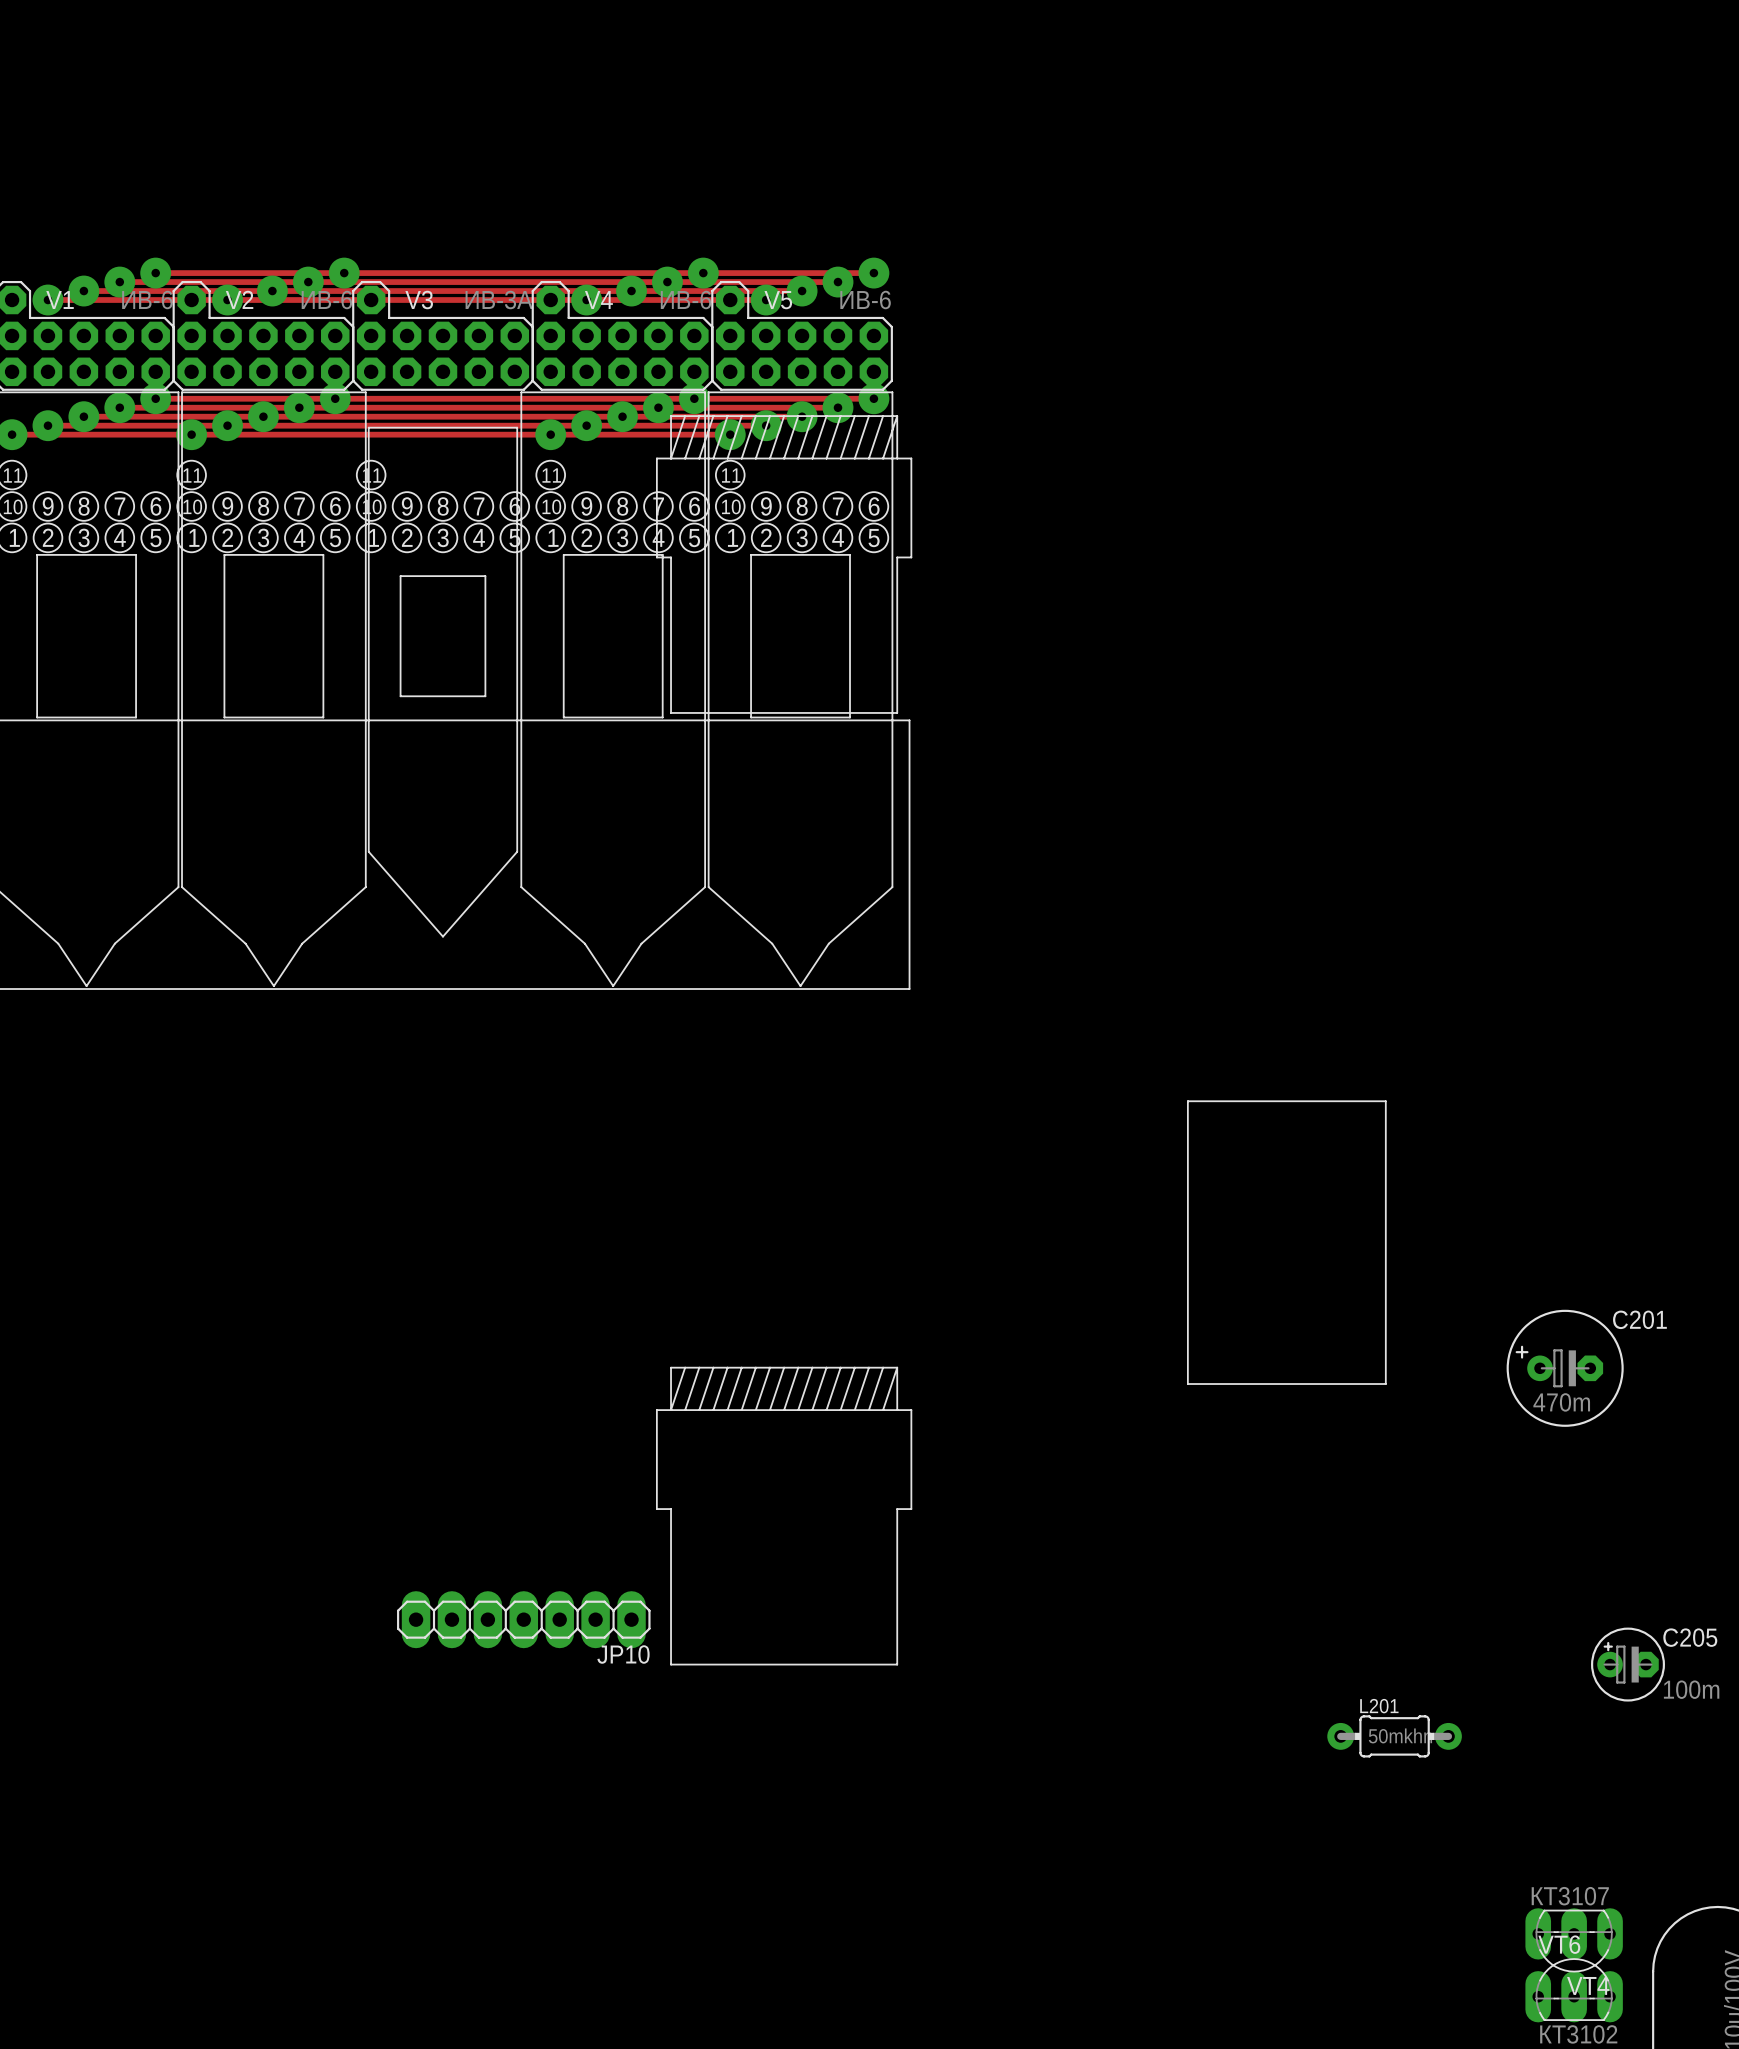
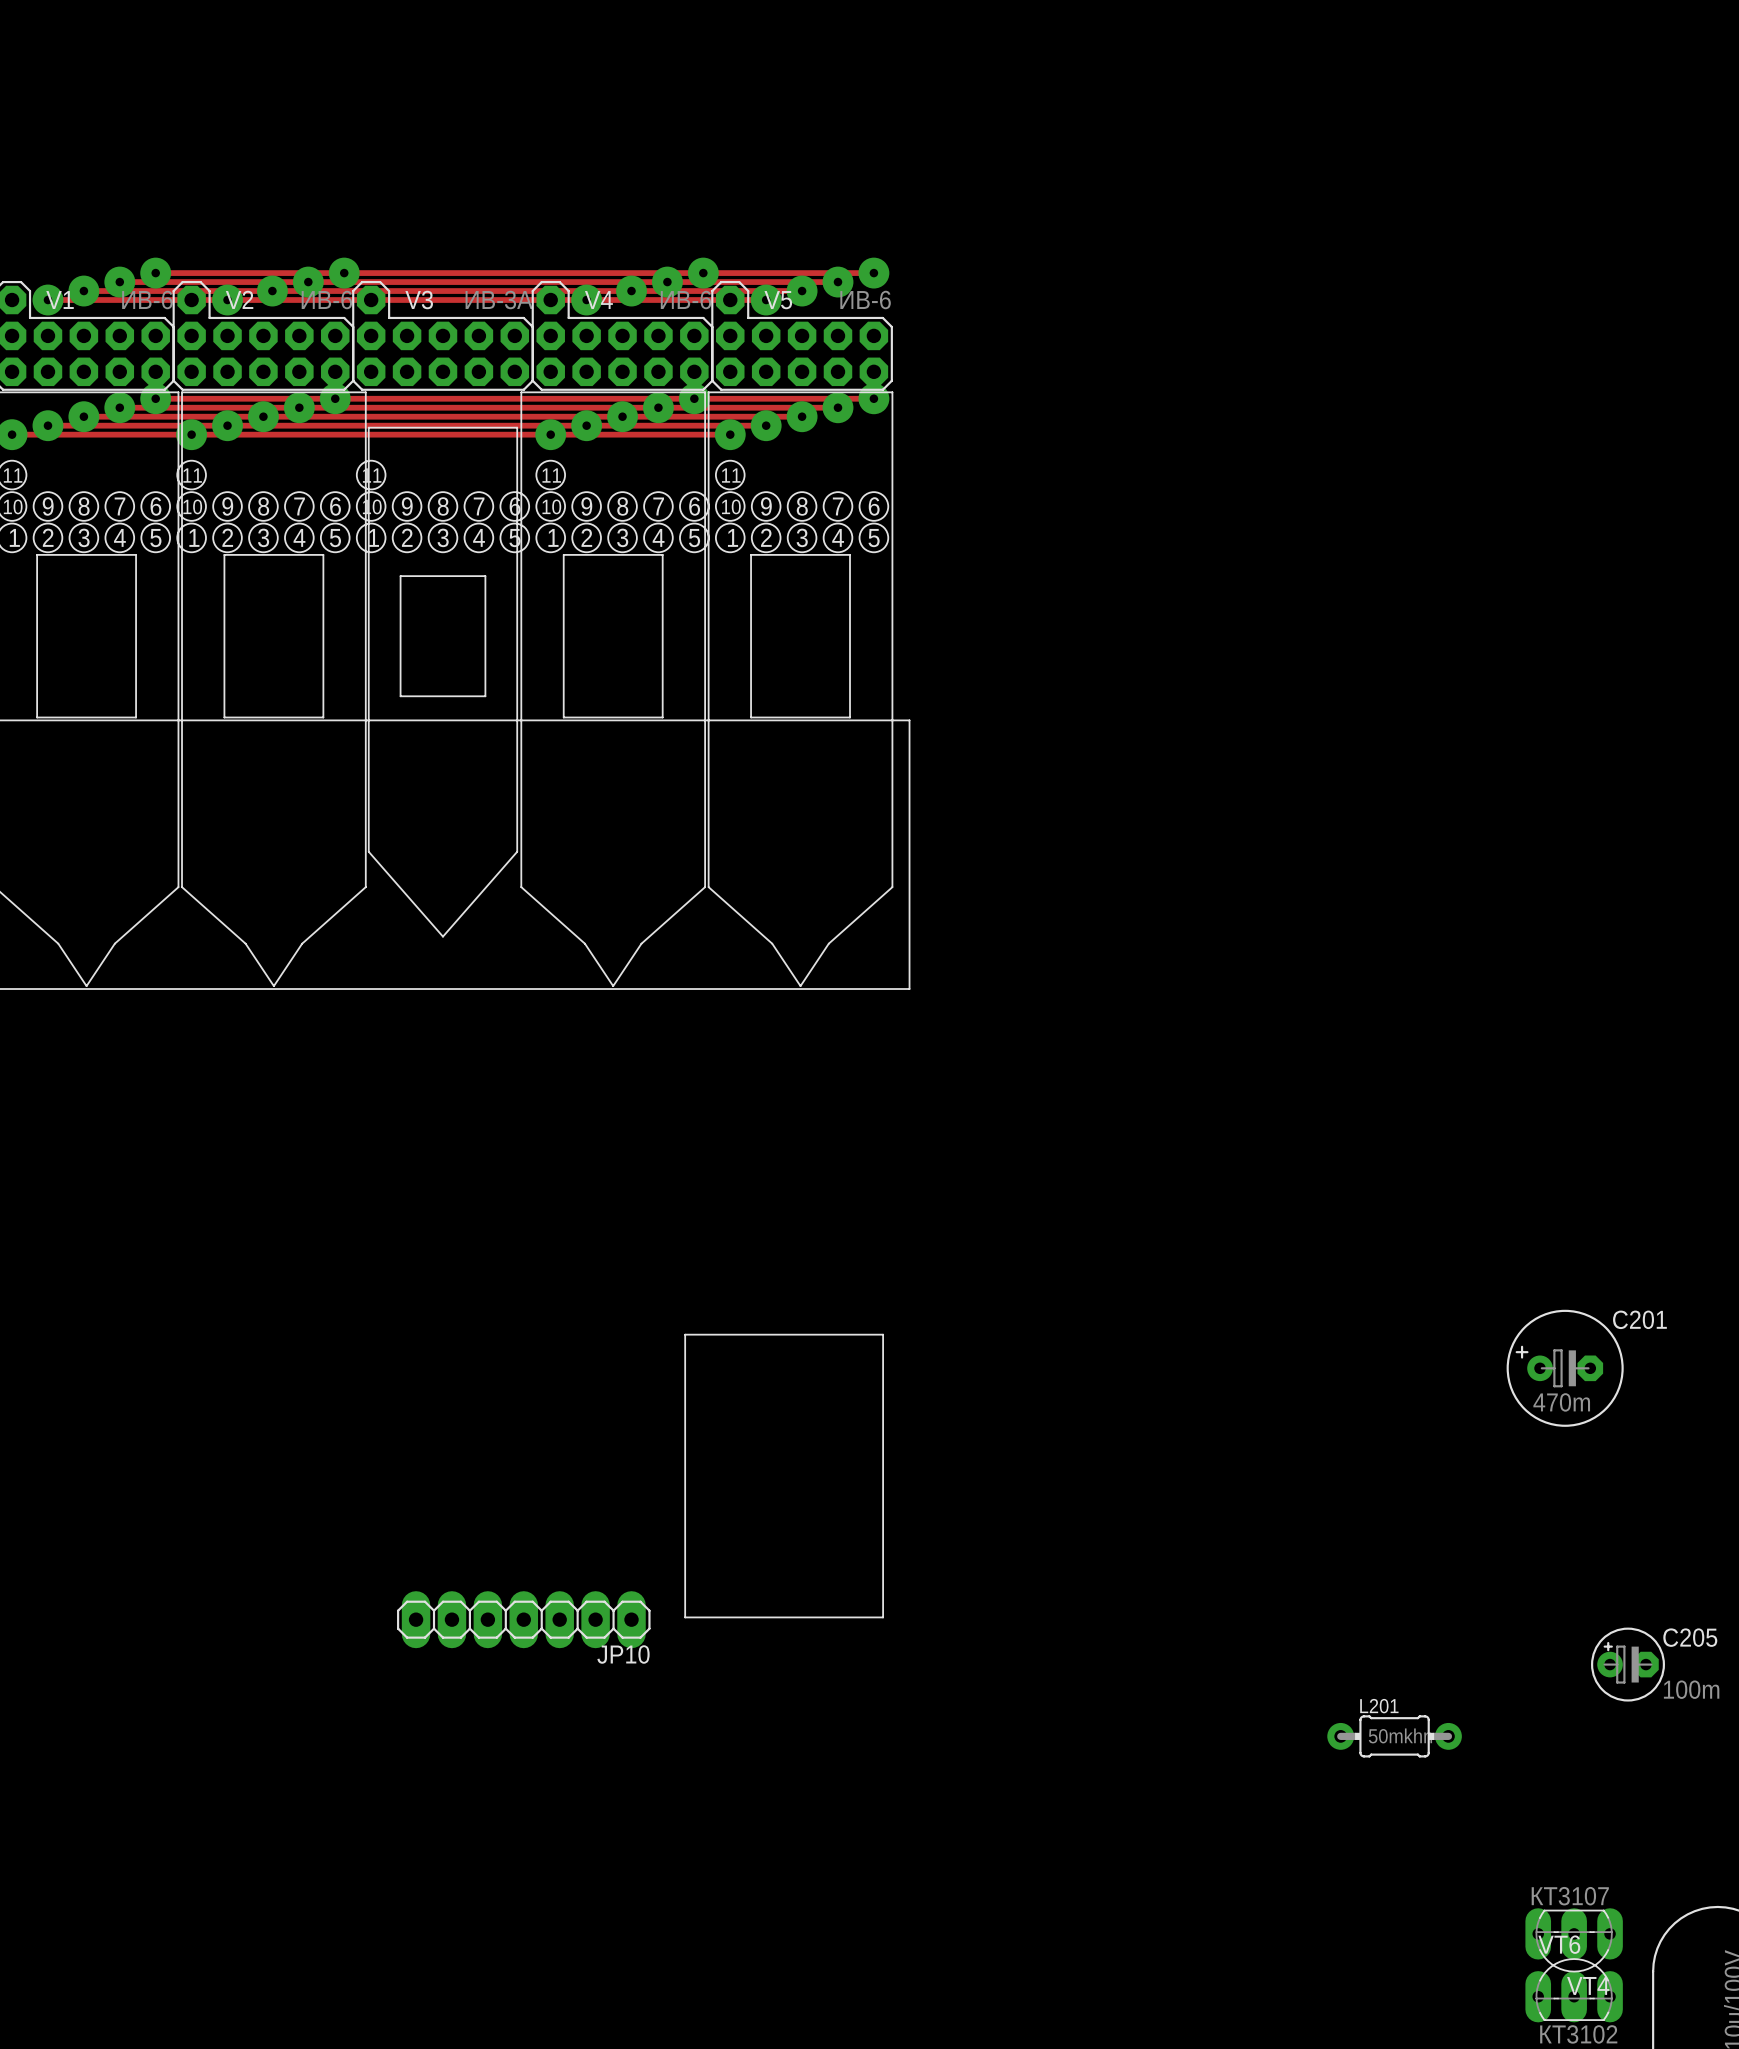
drawing: [655, 415, 913, 714] -> none
drawing: [1187, 1100, 1387, 1385] -> none
drawing: none -> [684, 1333, 884, 1619]
drawing: [655, 1366, 913, 1666] -> none

